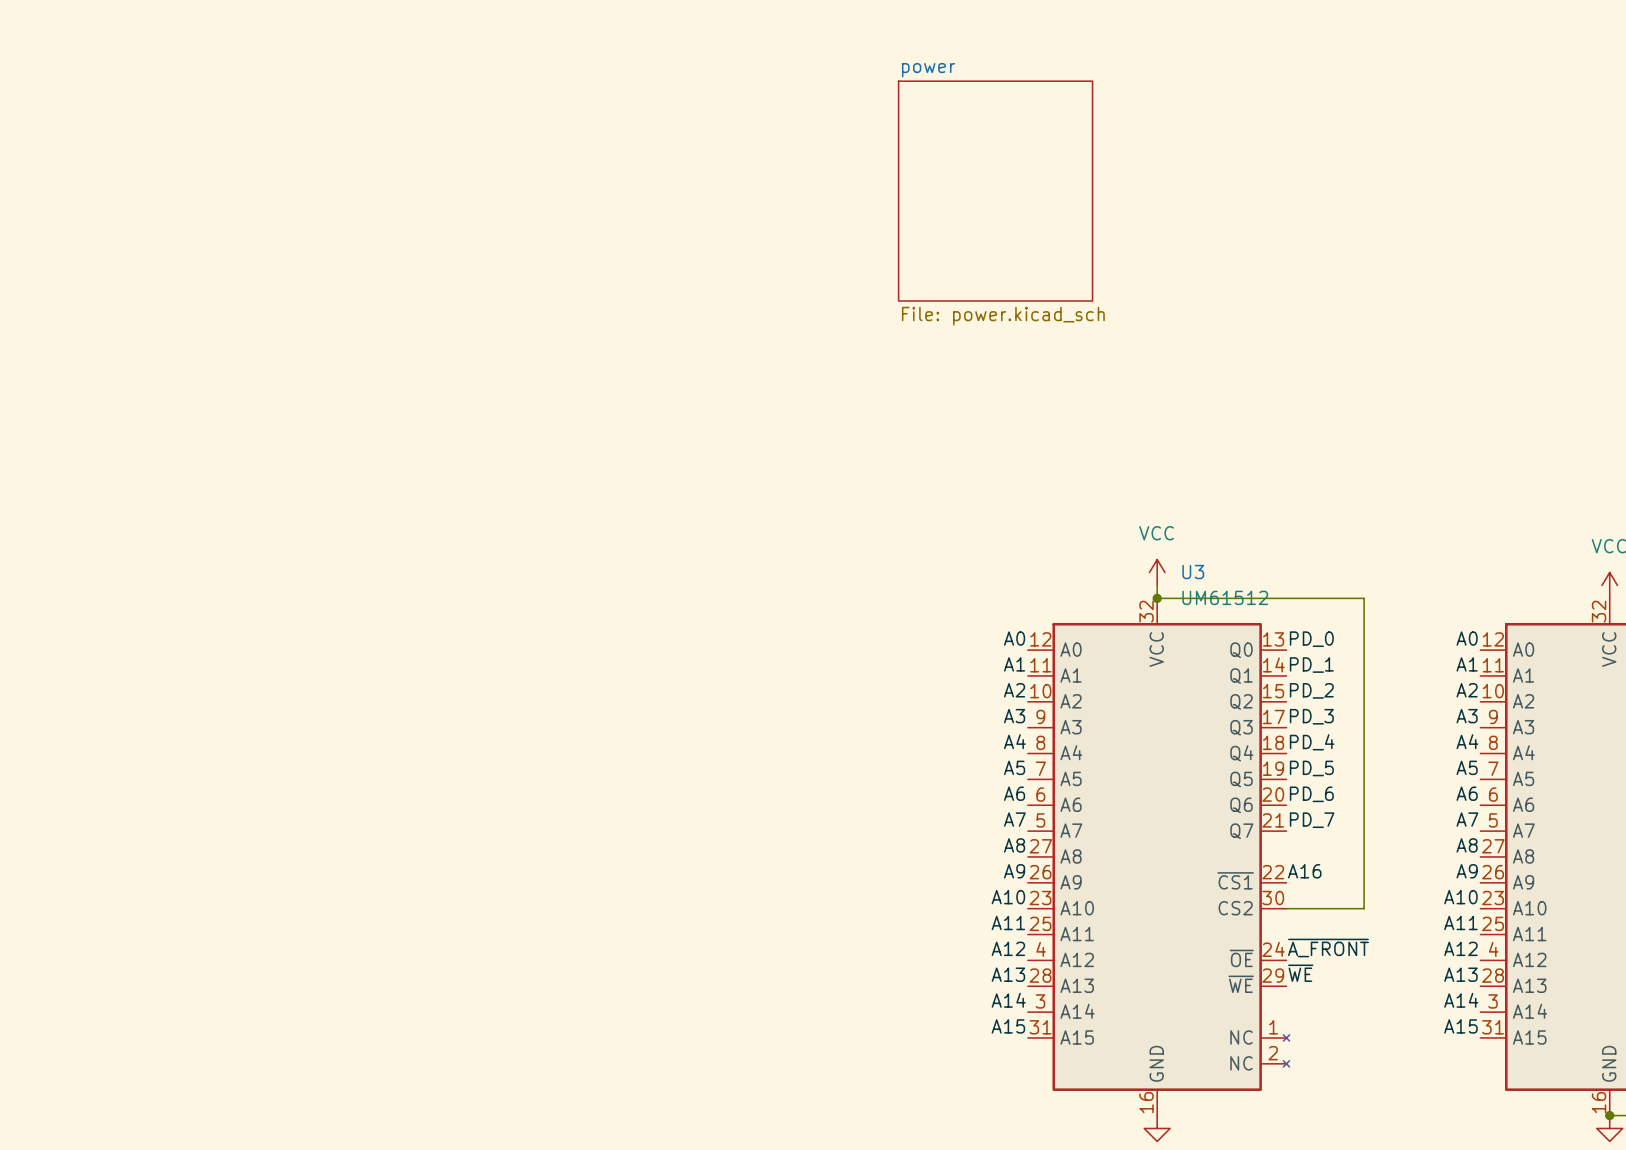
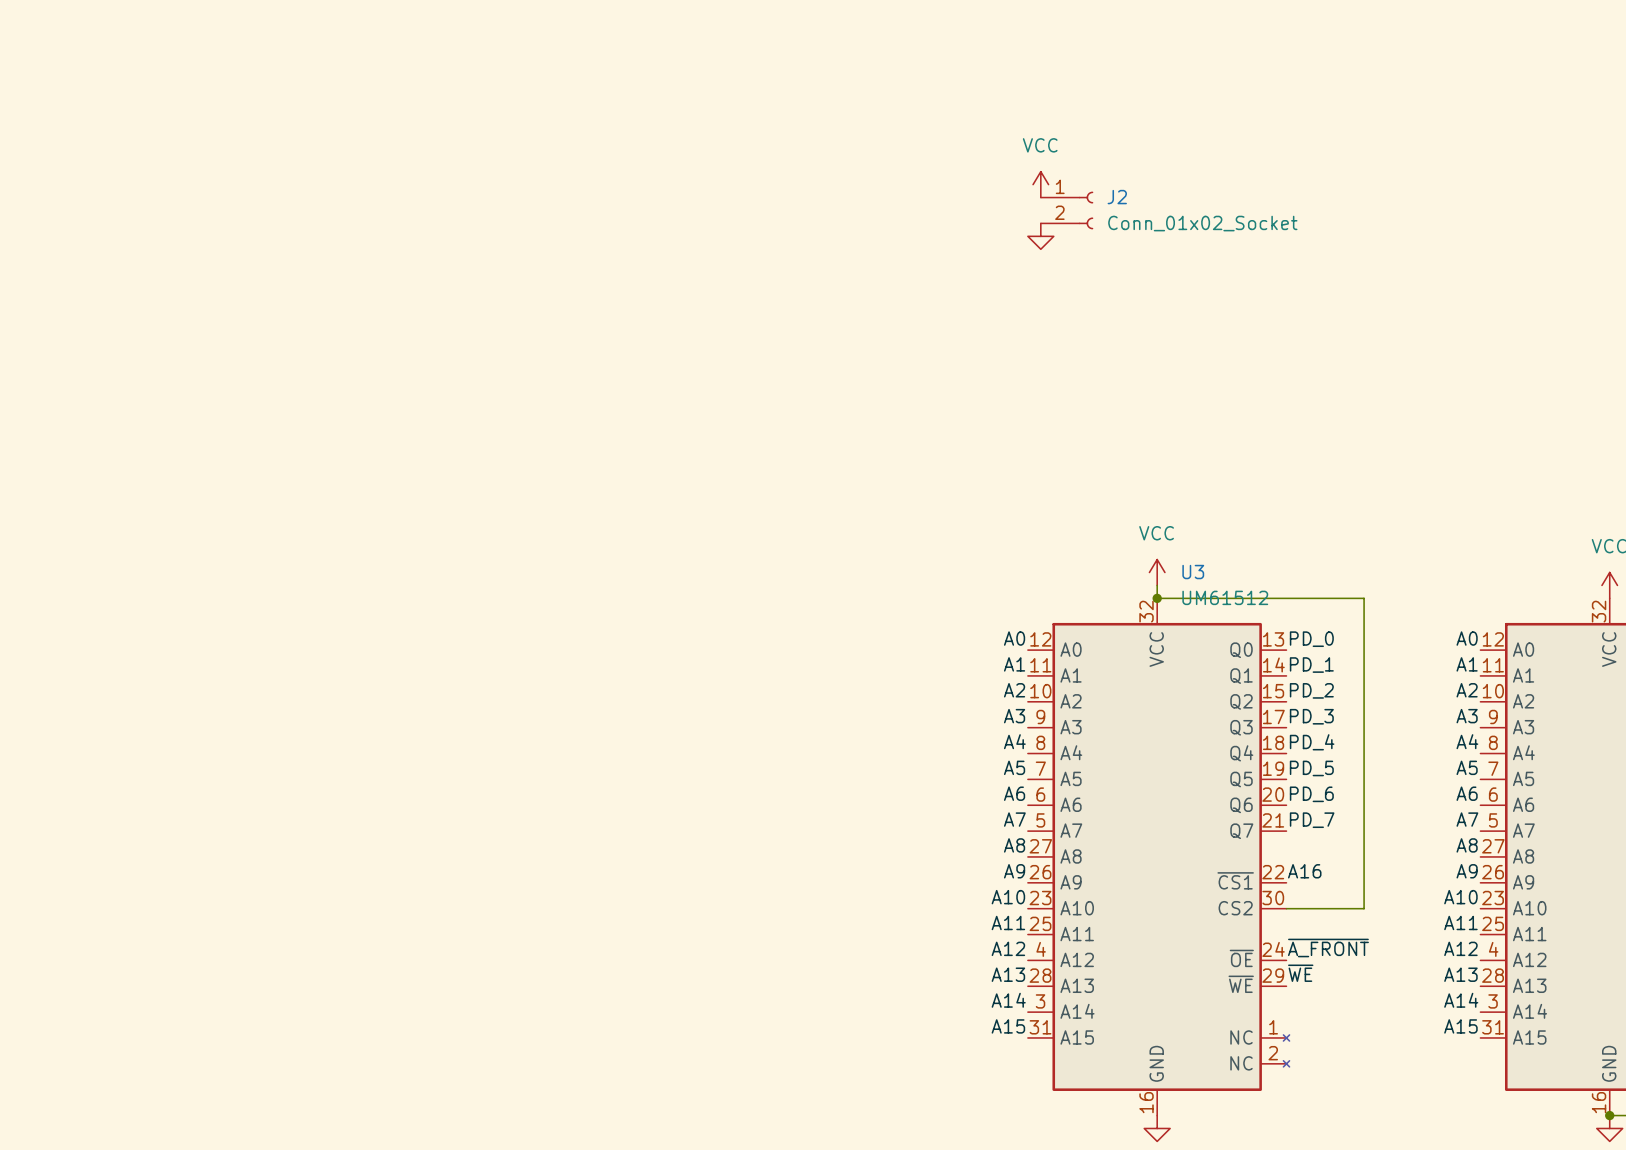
power symbol: none -> VCC (1040, 184)
sheet power: File: power.kicad_sch (995, 191) -> none
J2: none -> Conn_01x02_Socket (1067, 210)
power symbol: none -> (1040, 236)

